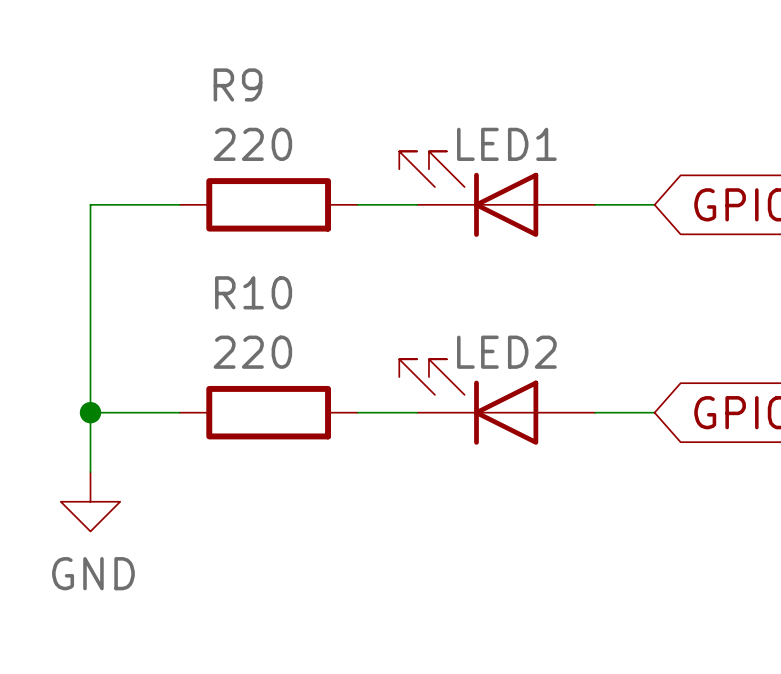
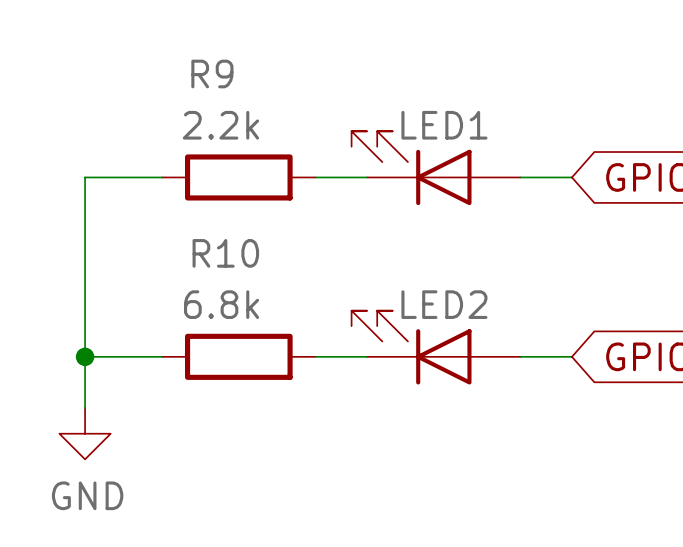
R9 value: 220 (252, 144) -> 2.2k (220, 125)
R10 value: 220 (252, 352) -> 6.8k (221, 304)

